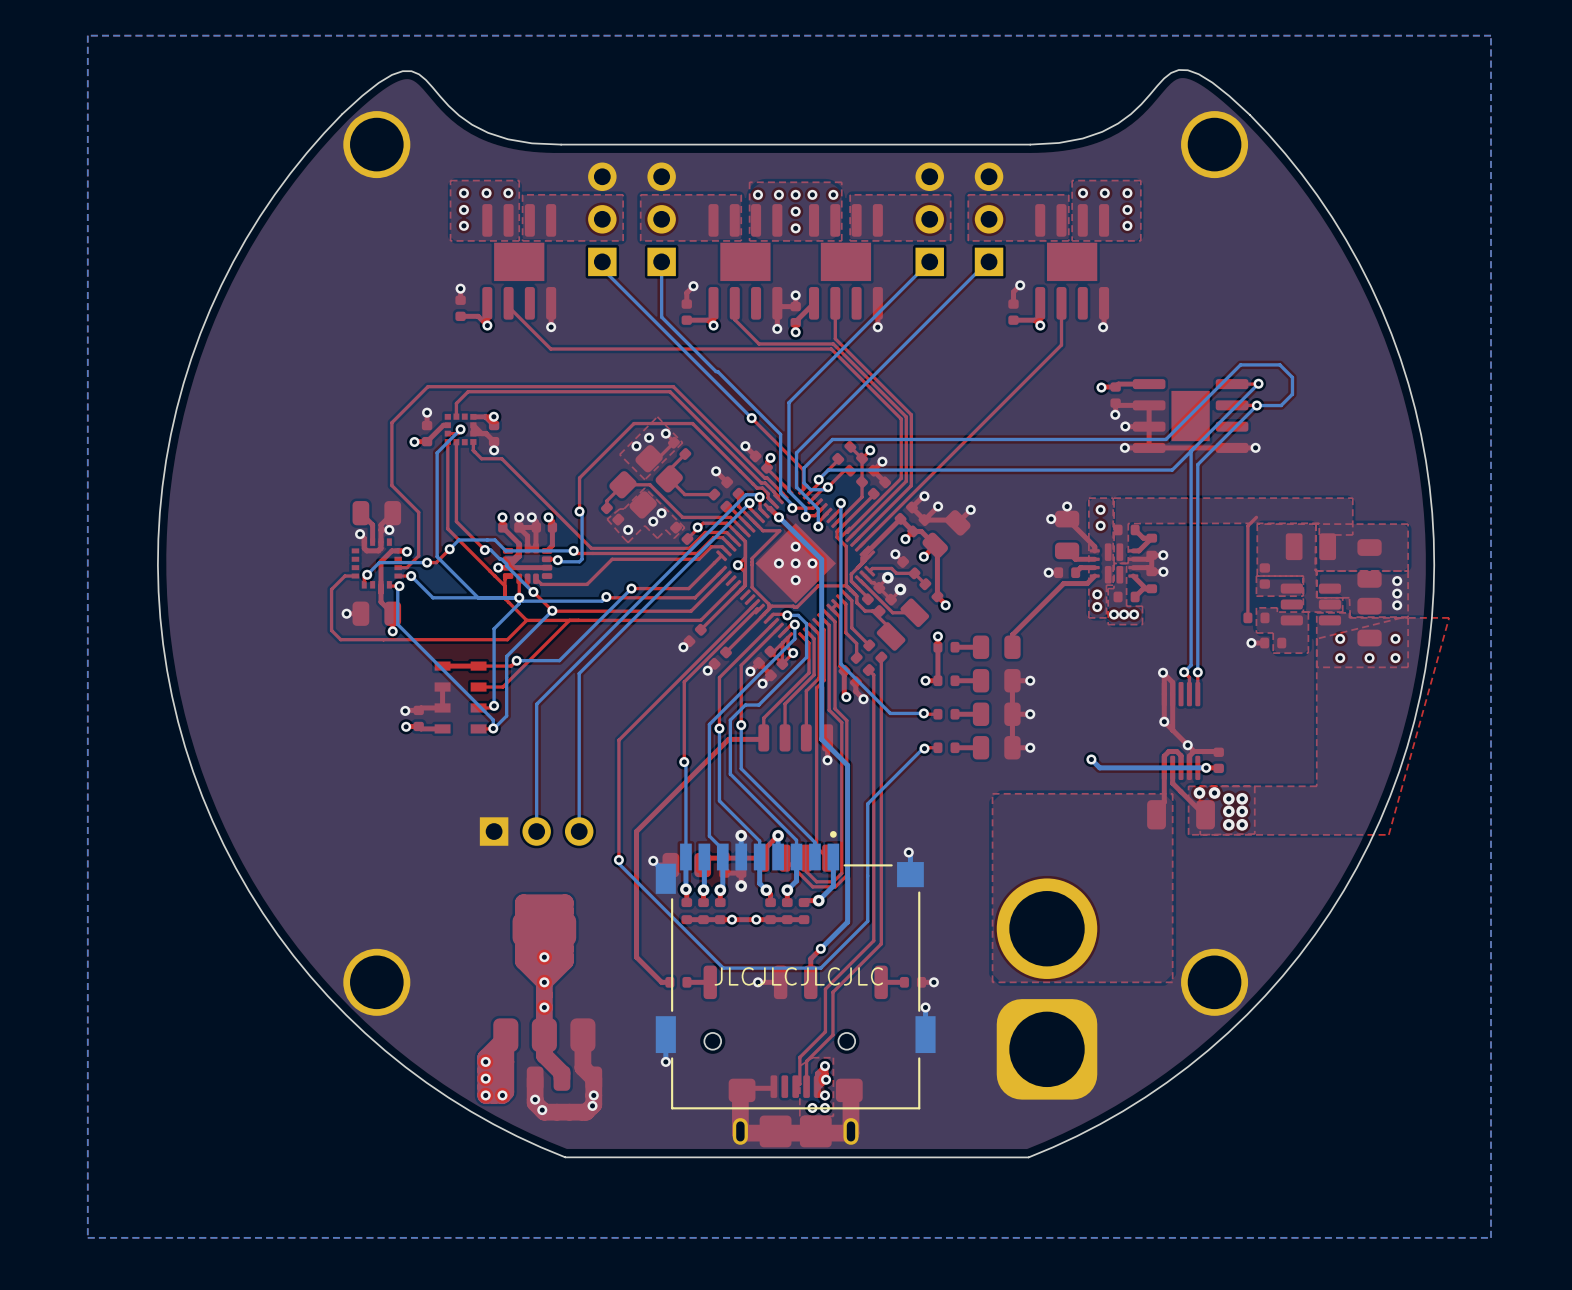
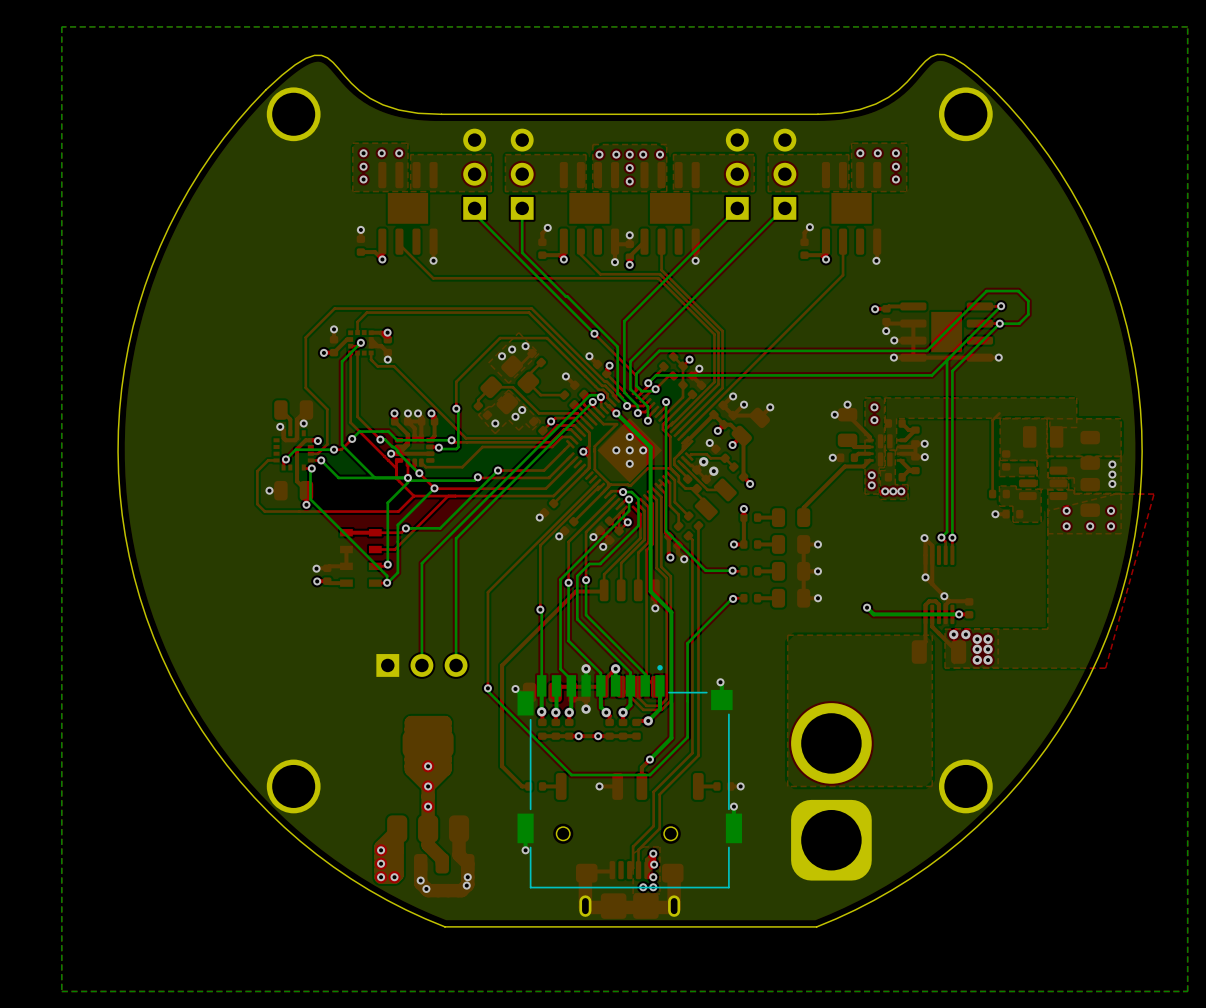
text: JLCJLCJLCJLC (798, 976) -> none

